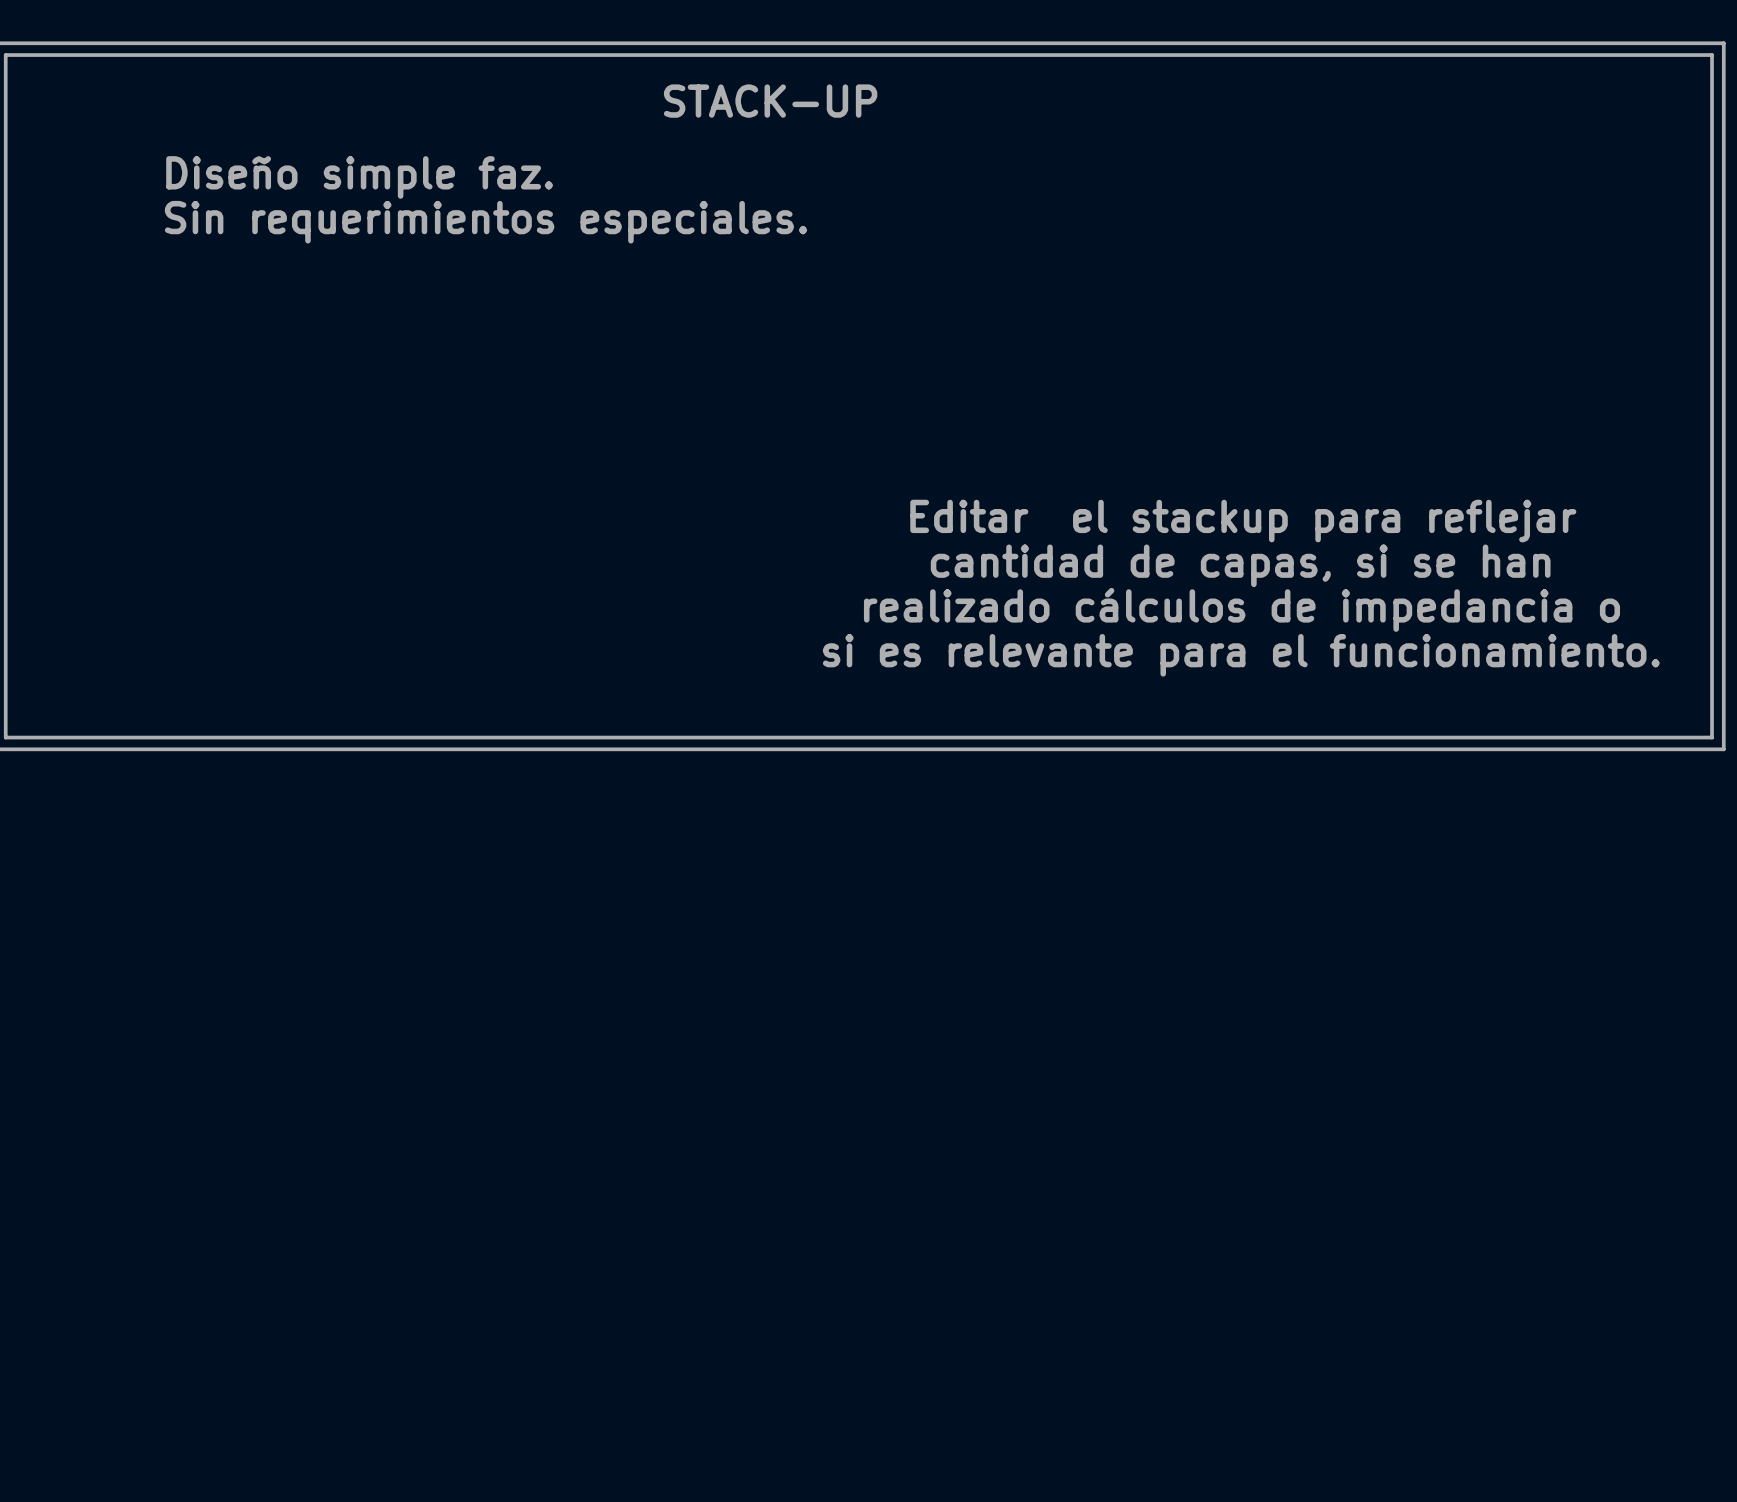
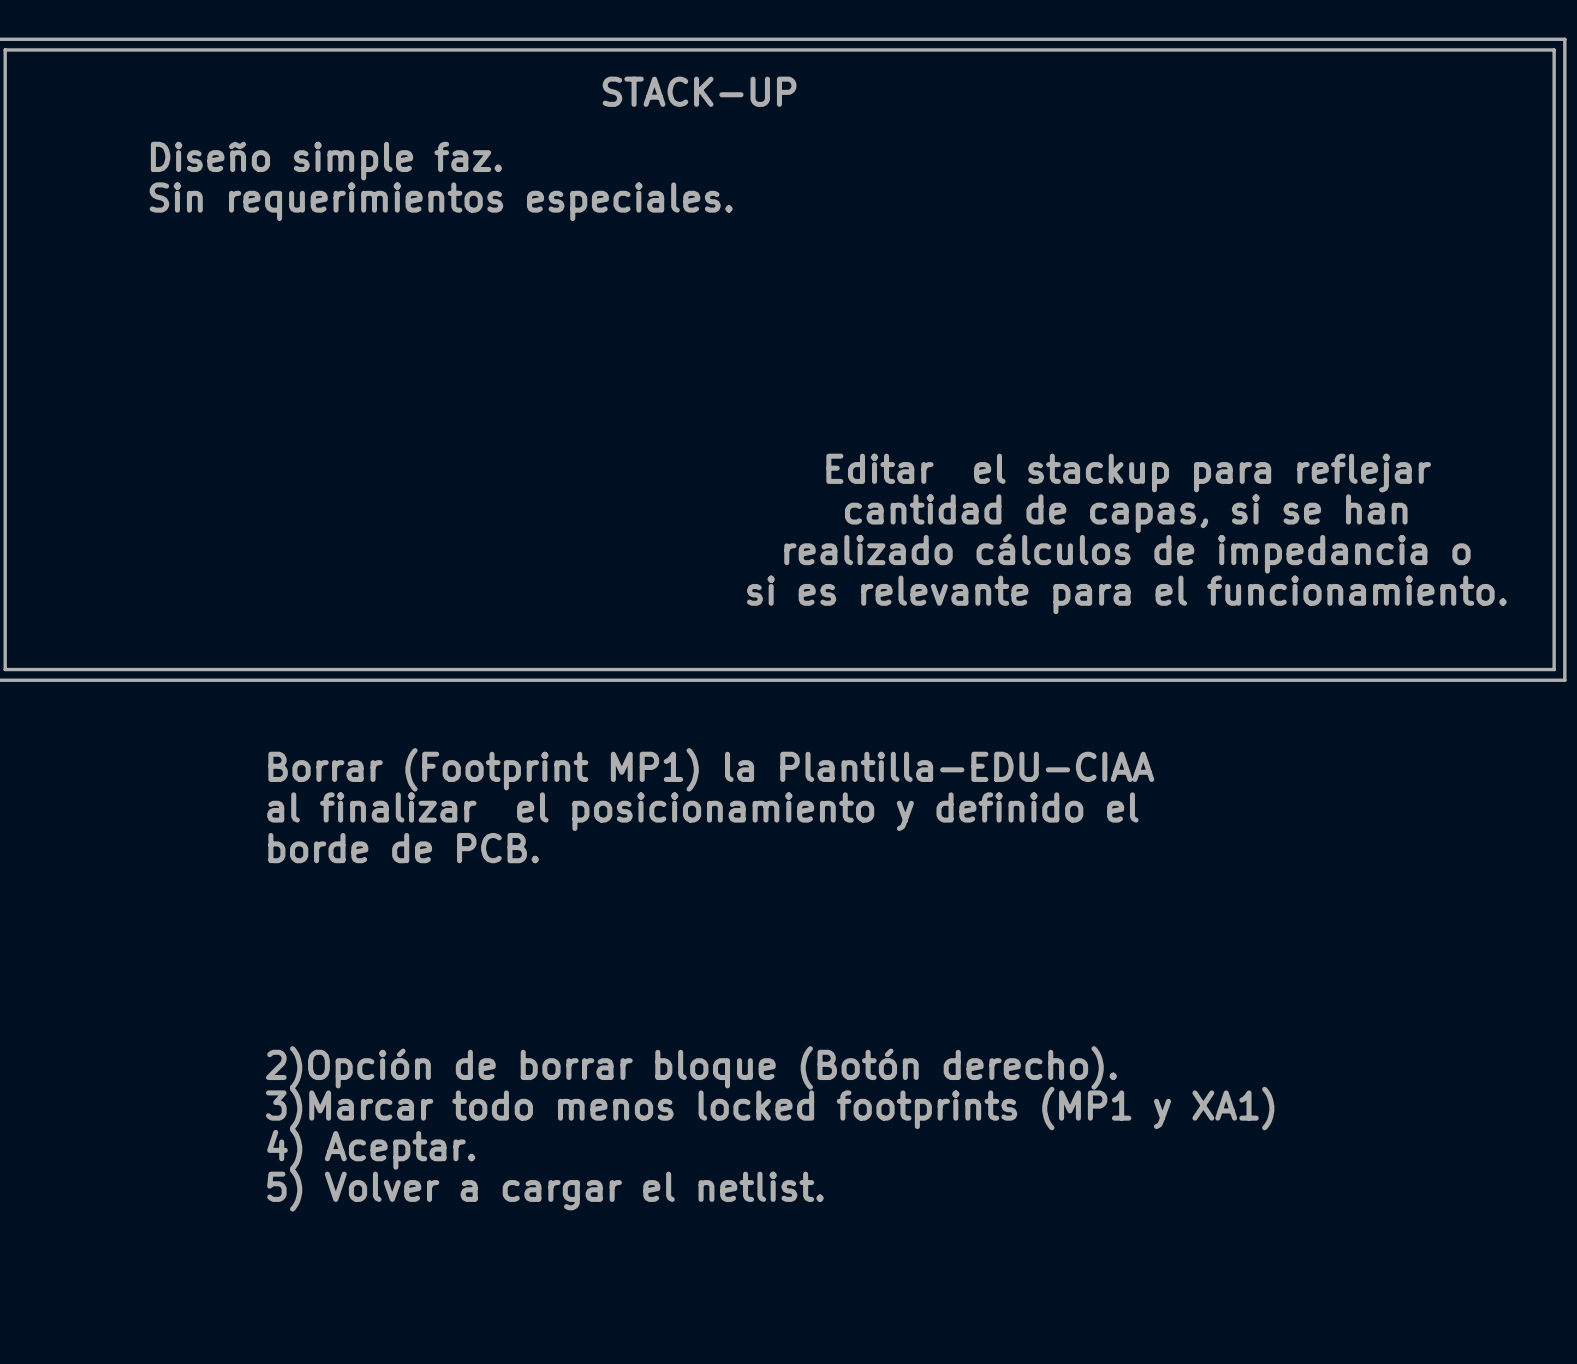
text: none -> Borrar (Footprint MP1) la Plantilla-EDU-CIAA (711, 769)
text: none -> al finalizar el posicionamiento y definido el (702, 811)
text: none -> borde de PCB. (403, 848)
text: none -> 2)Opción de borrar bloque (Botón derecho). (691, 1067)
text: none -> 3)Marcar todo menos locked footprints (MP1 y XA1) (770, 1108)
text: none -> 4) Aceptar. (371, 1149)
text: none -> 5) Volver a cargar el netlist. (545, 1189)

